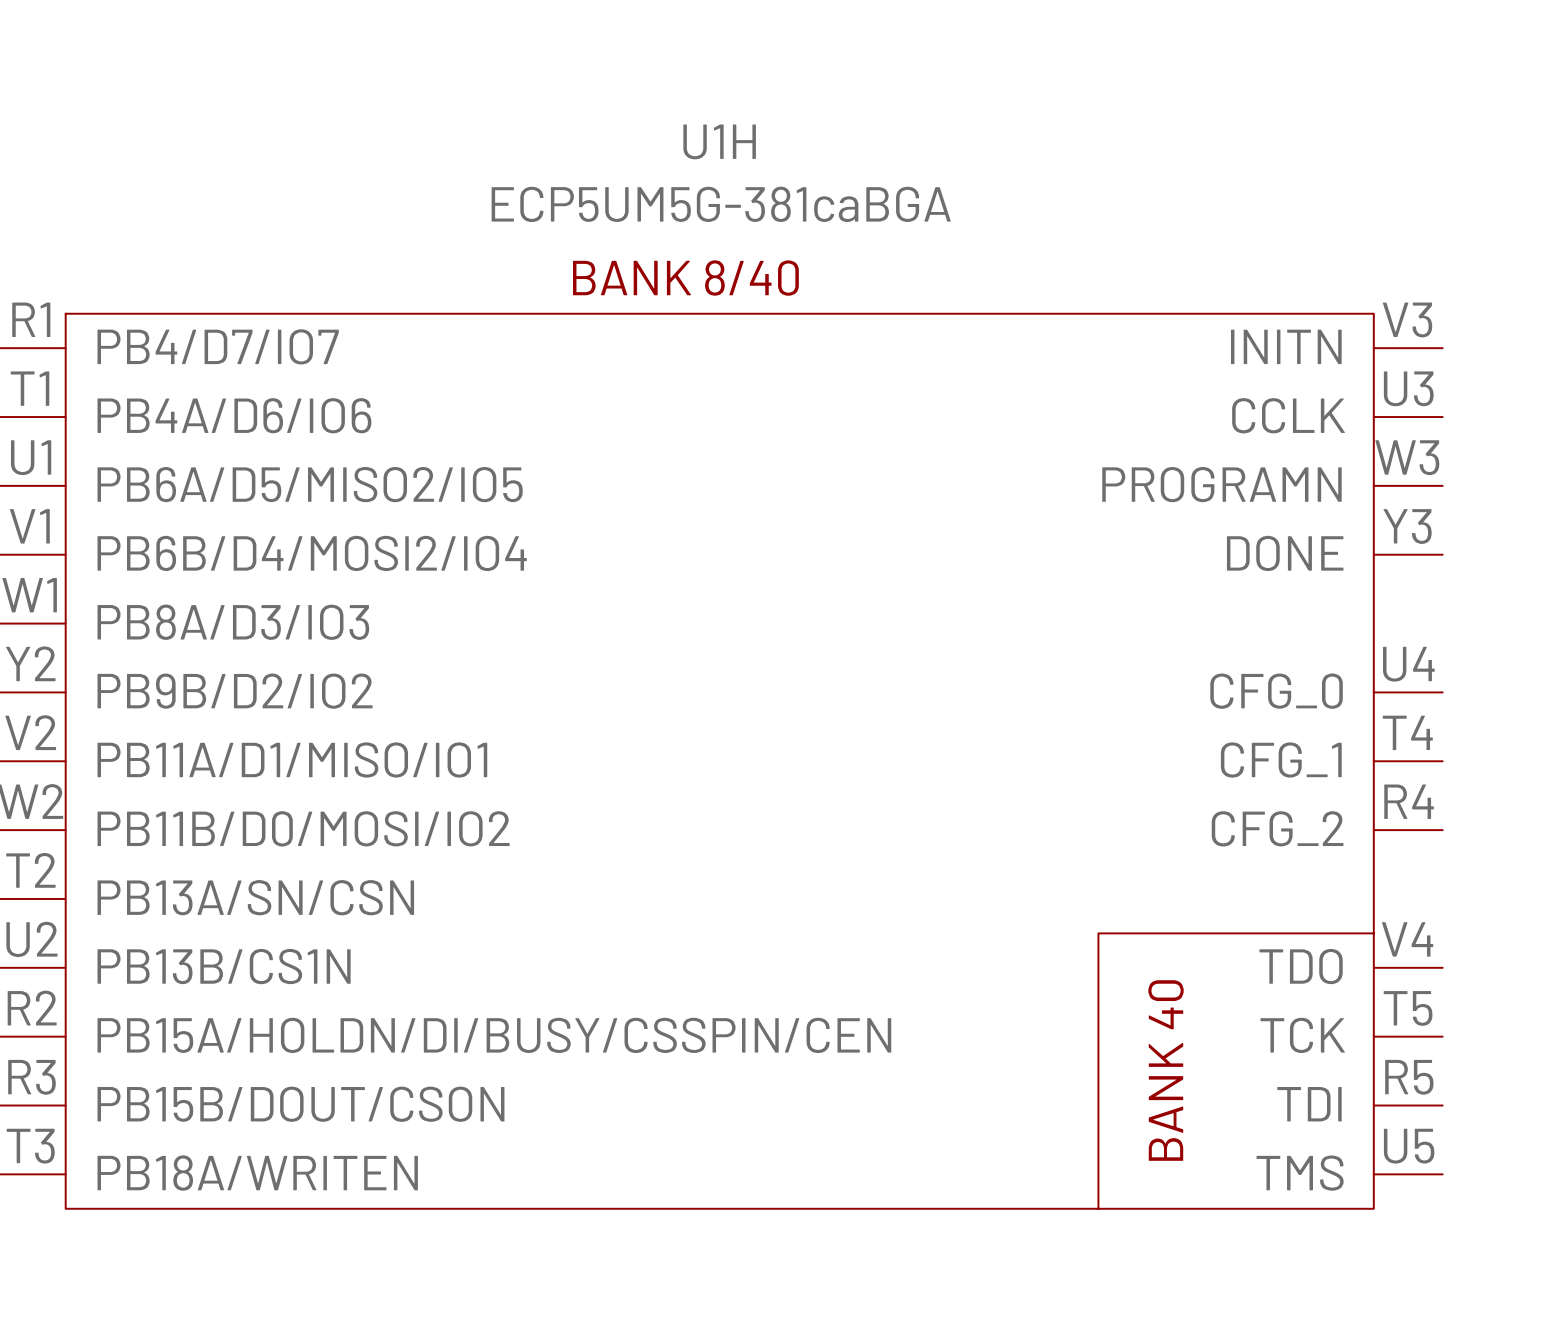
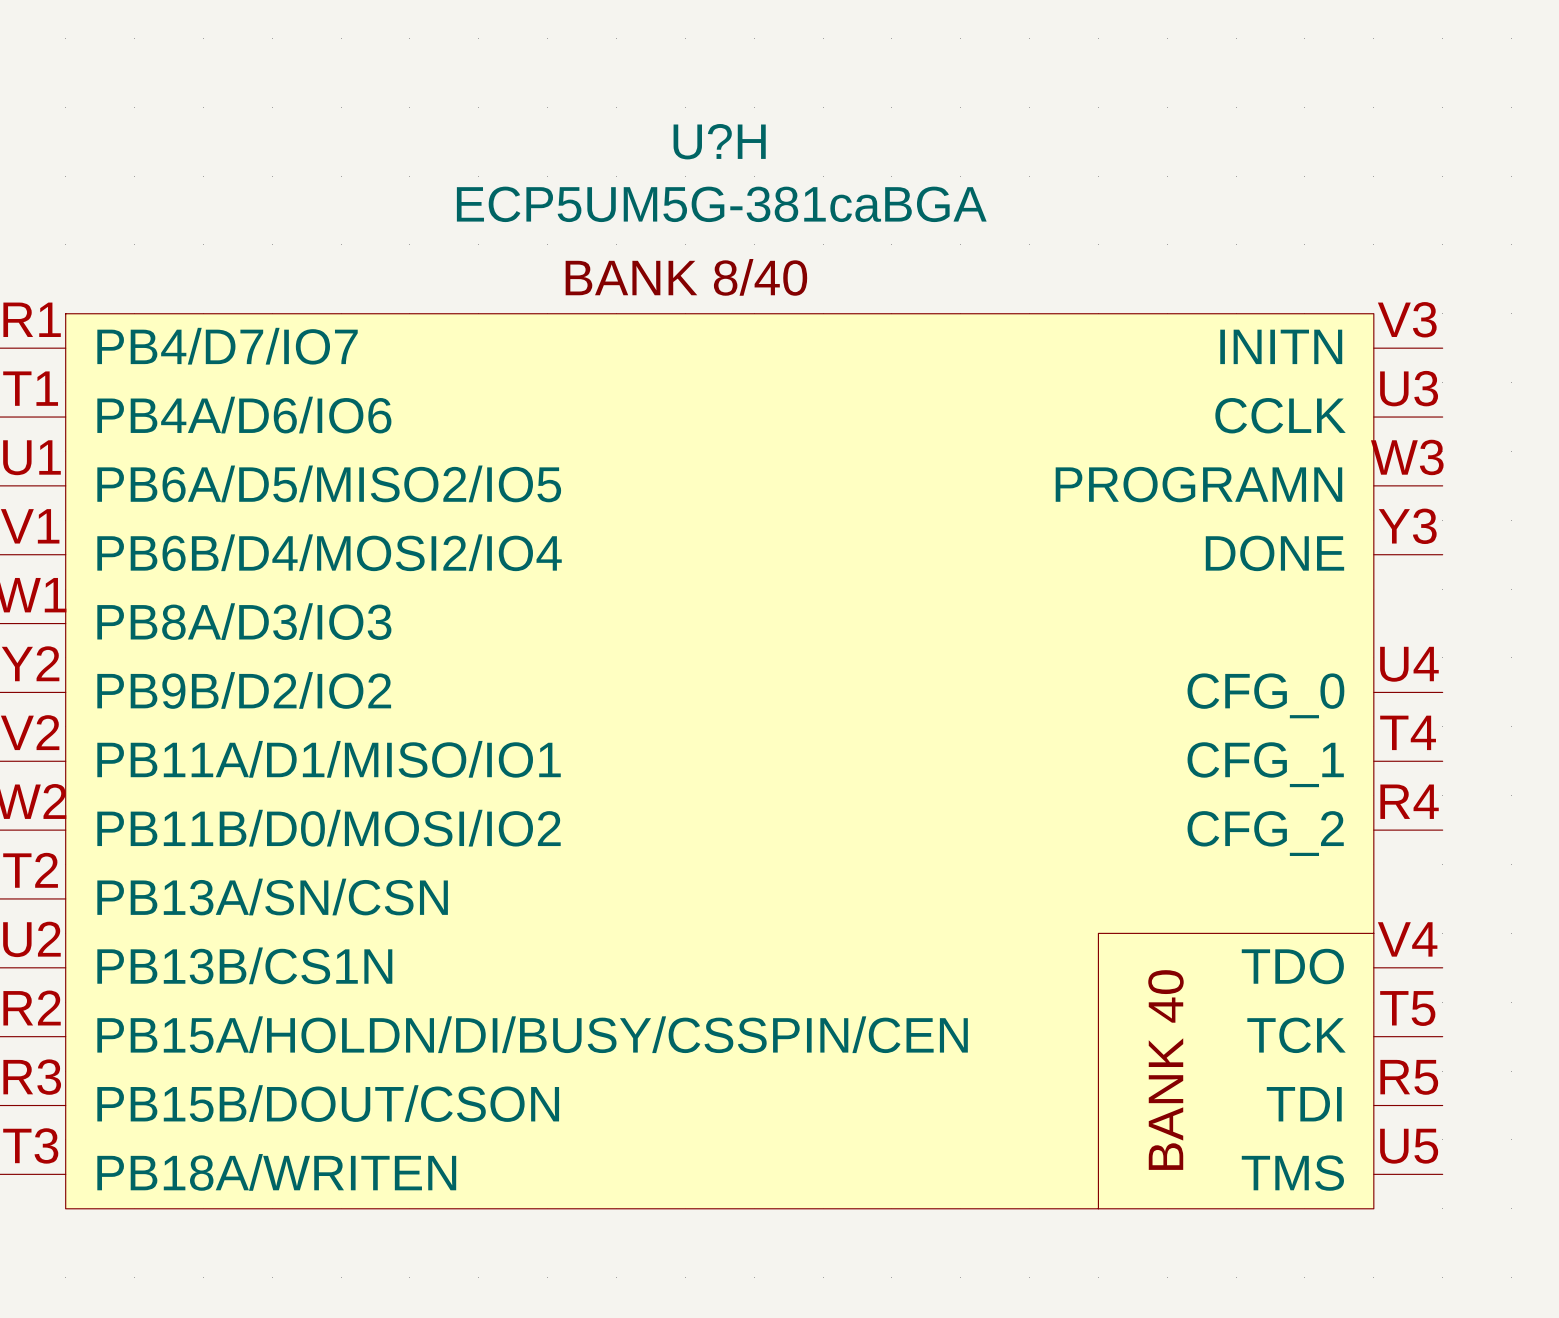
U1H name: U1H (719, 141) -> U?H (719, 141)

